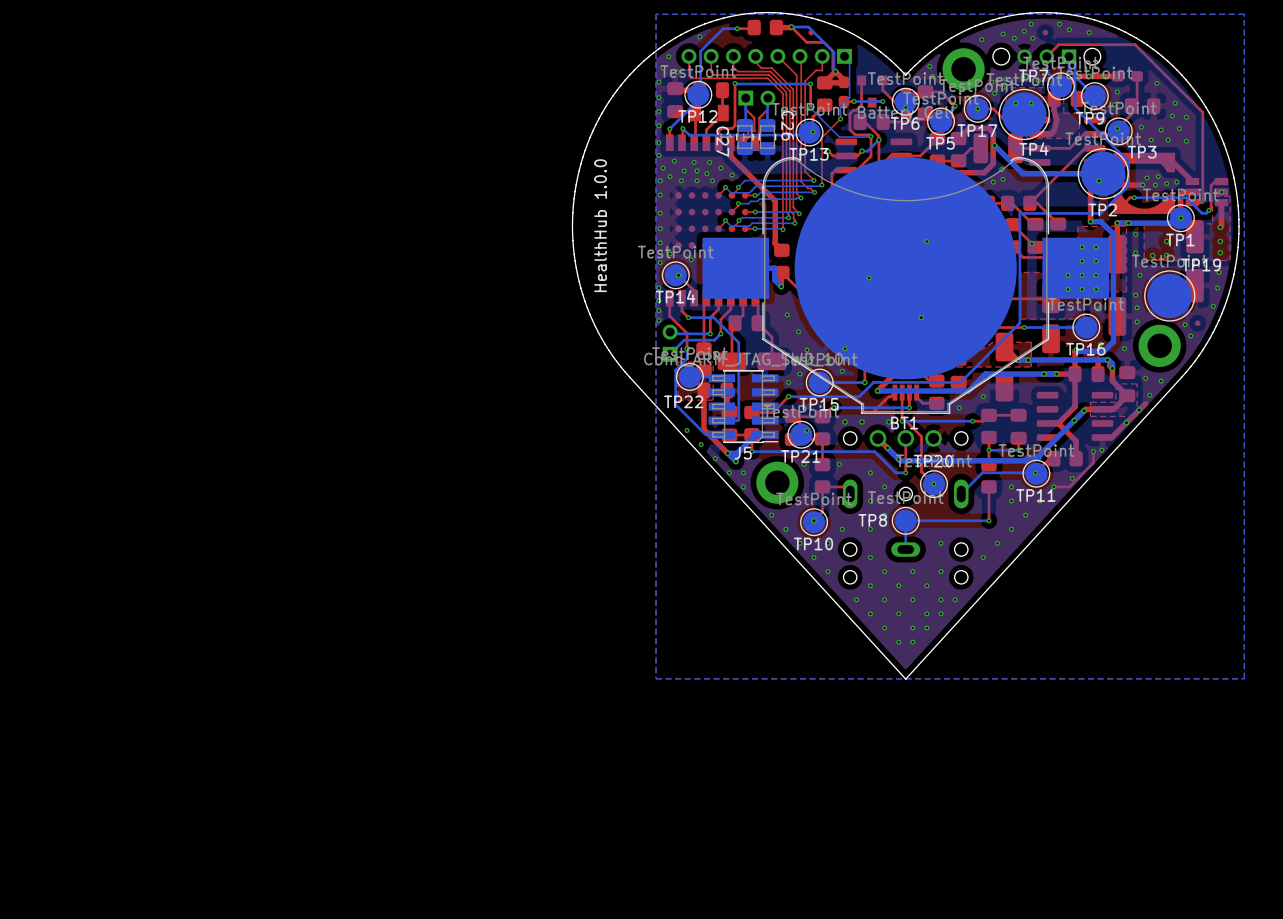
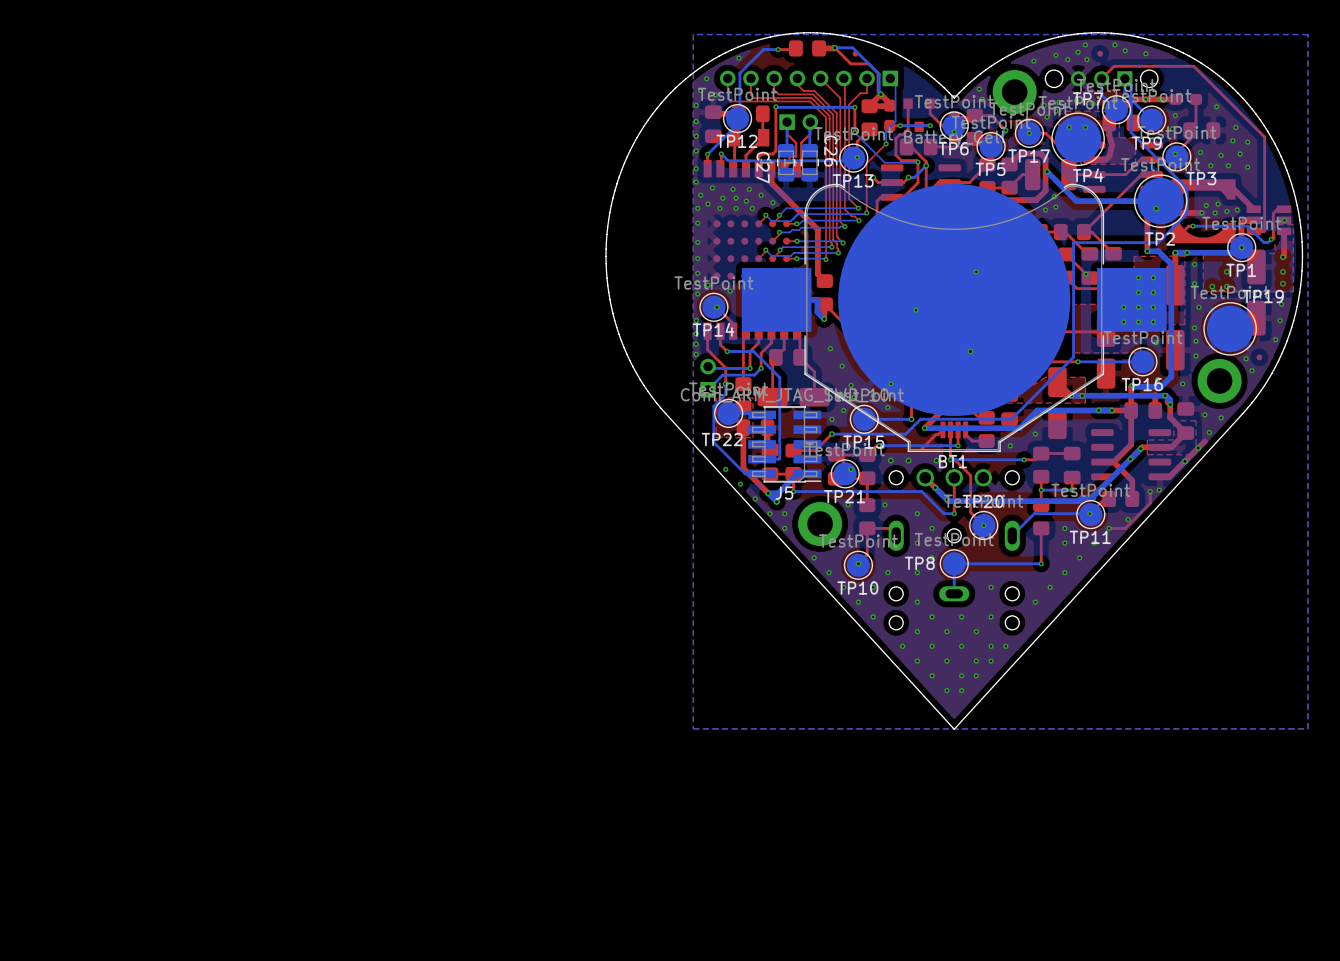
text: HealthHub 1.0.0 (600, 225) -> none

